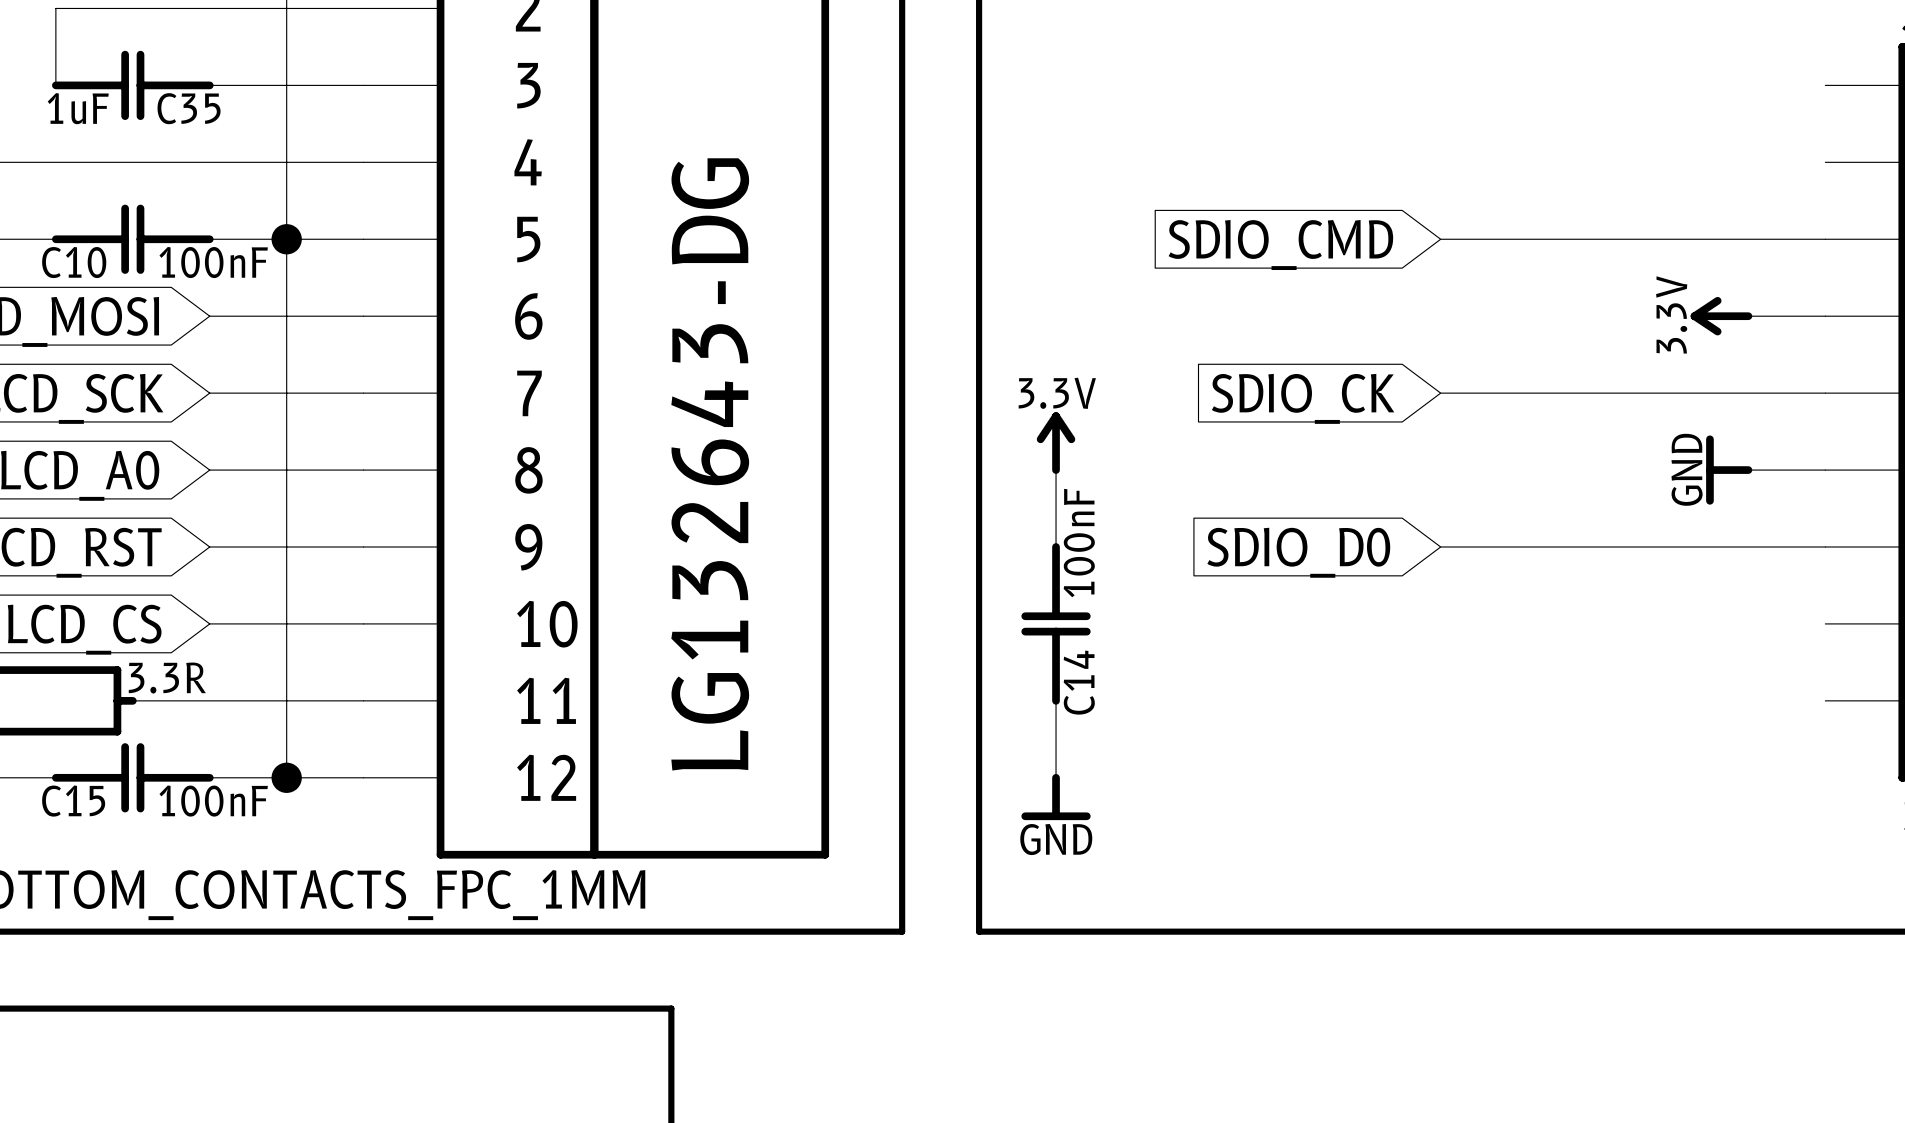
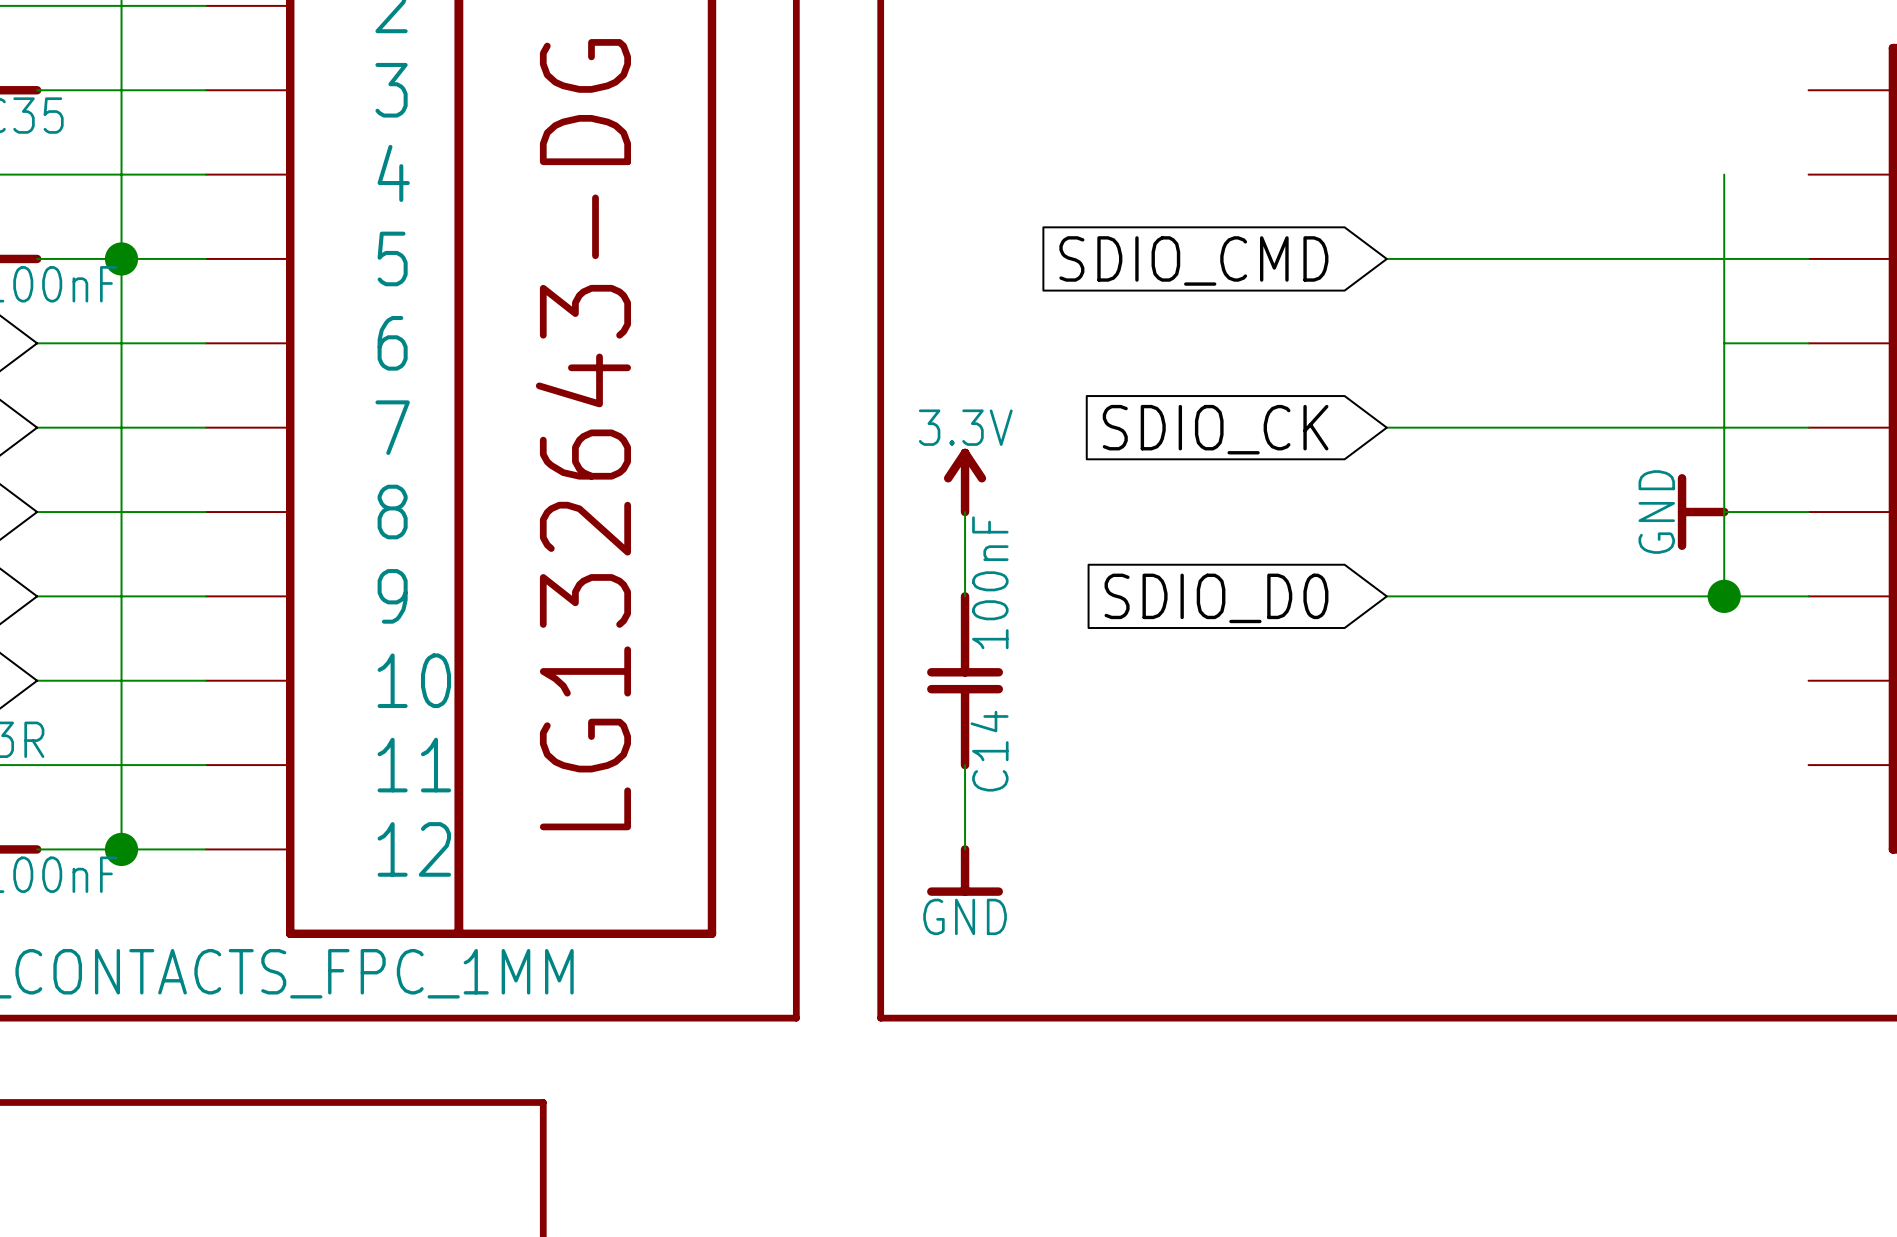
wire: none -> (1724, 174) (1724, 596)
power symbol: 3.3V (1721, 316) -> none
junction: none -> (1724, 596)

